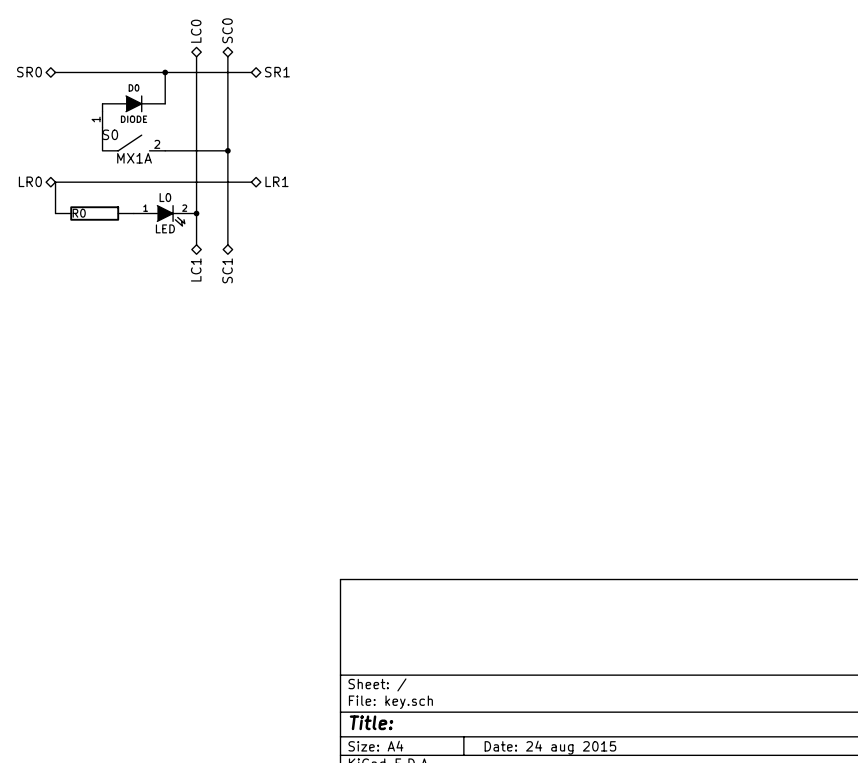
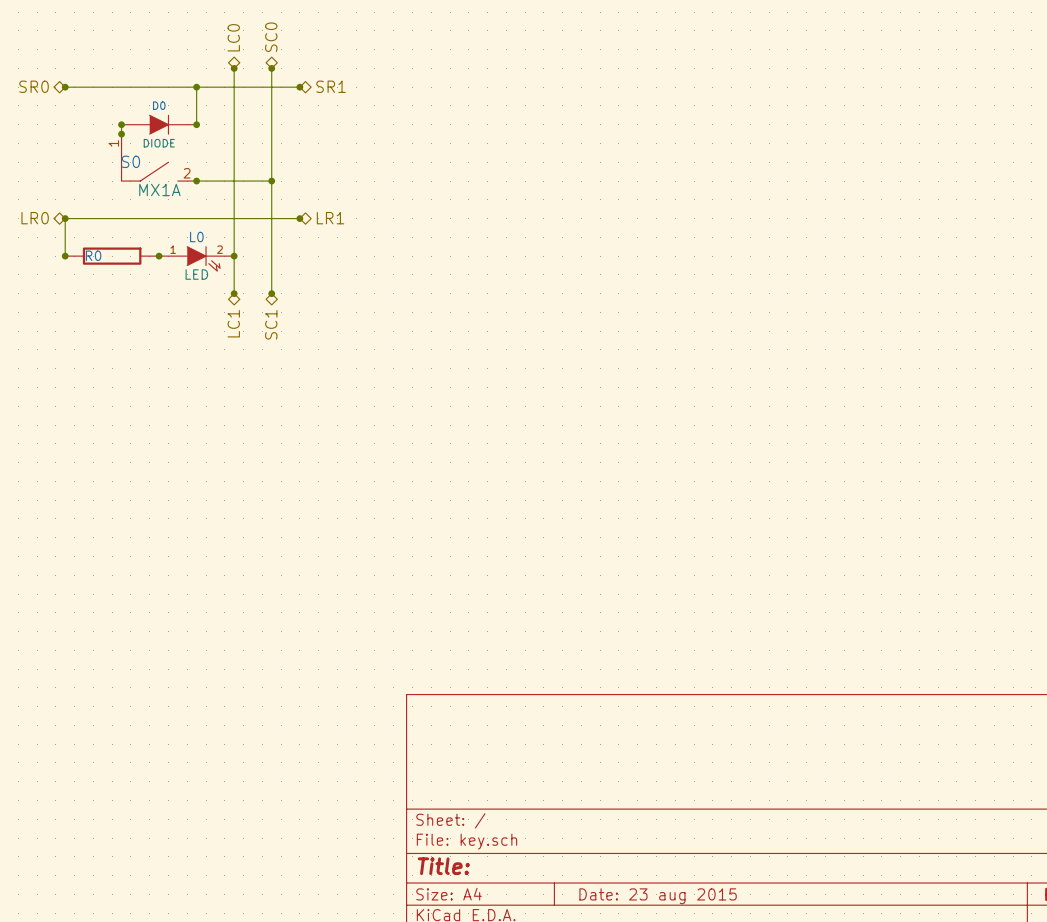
junction: none -> (234, 68)
junction: none -> (271, 68)
junction: none -> (65, 87)
junction: none -> (299, 87)
junction: none -> (121, 124)
junction: none -> (196, 124)
junction: none -> (121, 134)
junction: none -> (196, 181)
junction: none -> (65, 218)
junction: none -> (299, 218)
junction: none -> (65, 256)
junction: none -> (159, 256)
junction: none -> (234, 293)
junction: none -> (271, 293)
title block: Date: 24 aug 2015 (550, 747) -> Date: 23 aug 2015 (658, 896)

